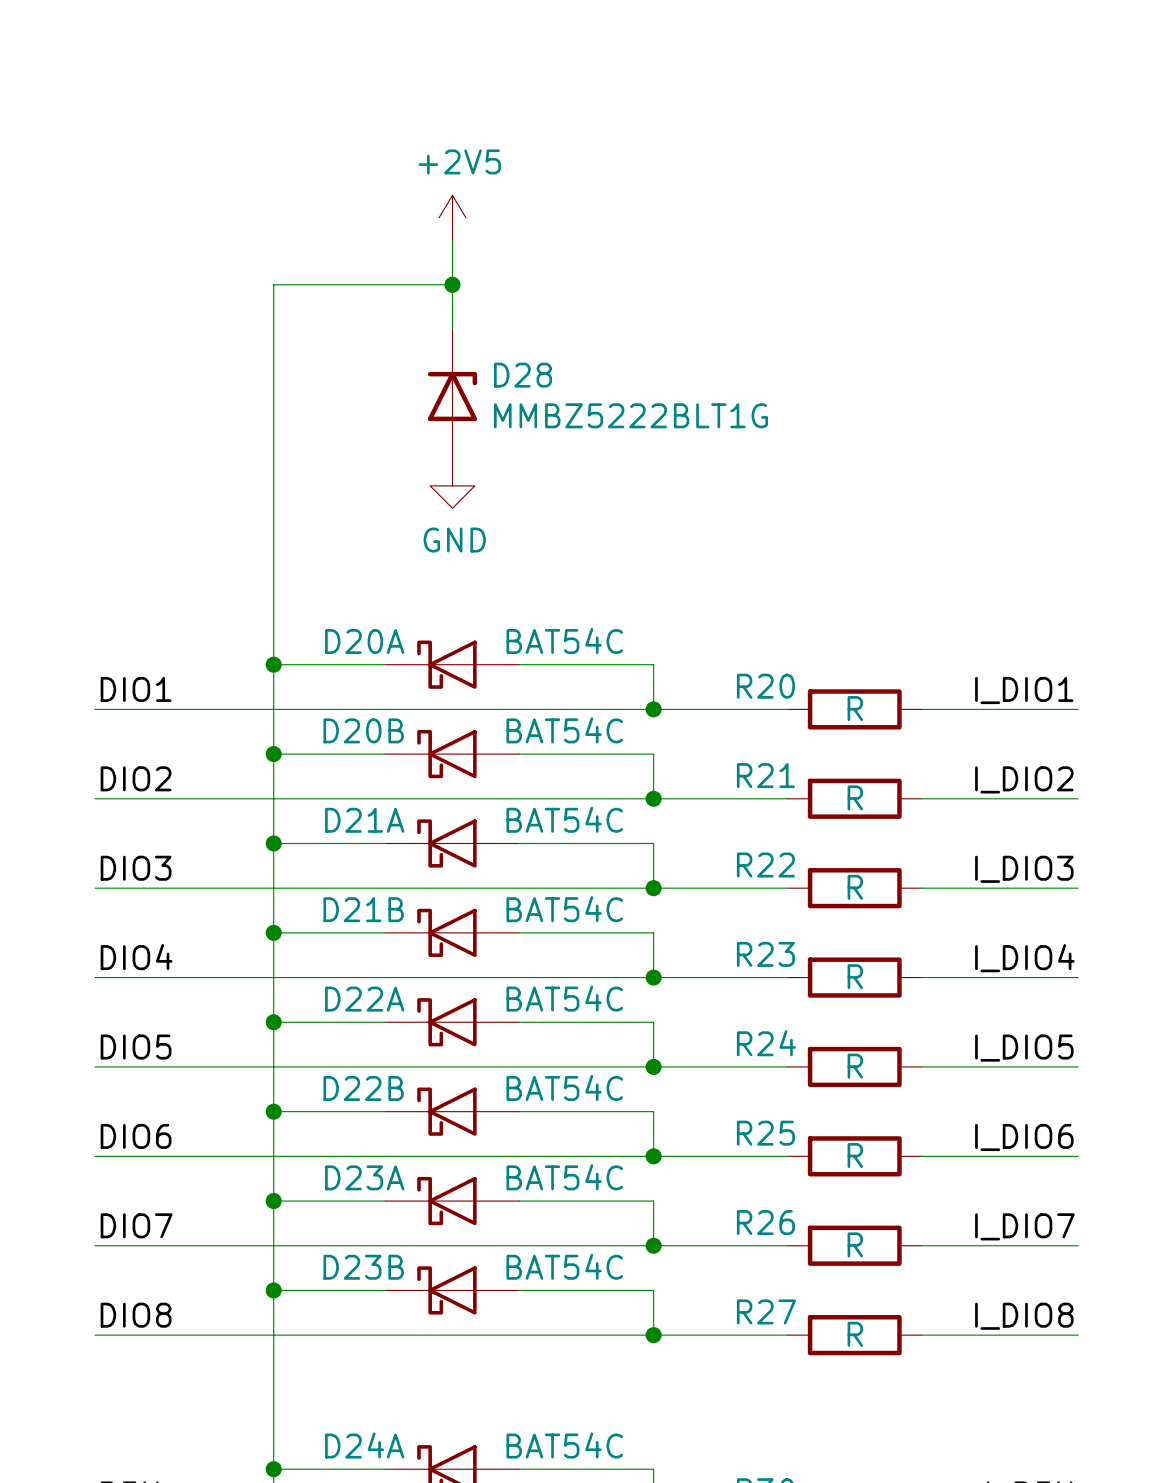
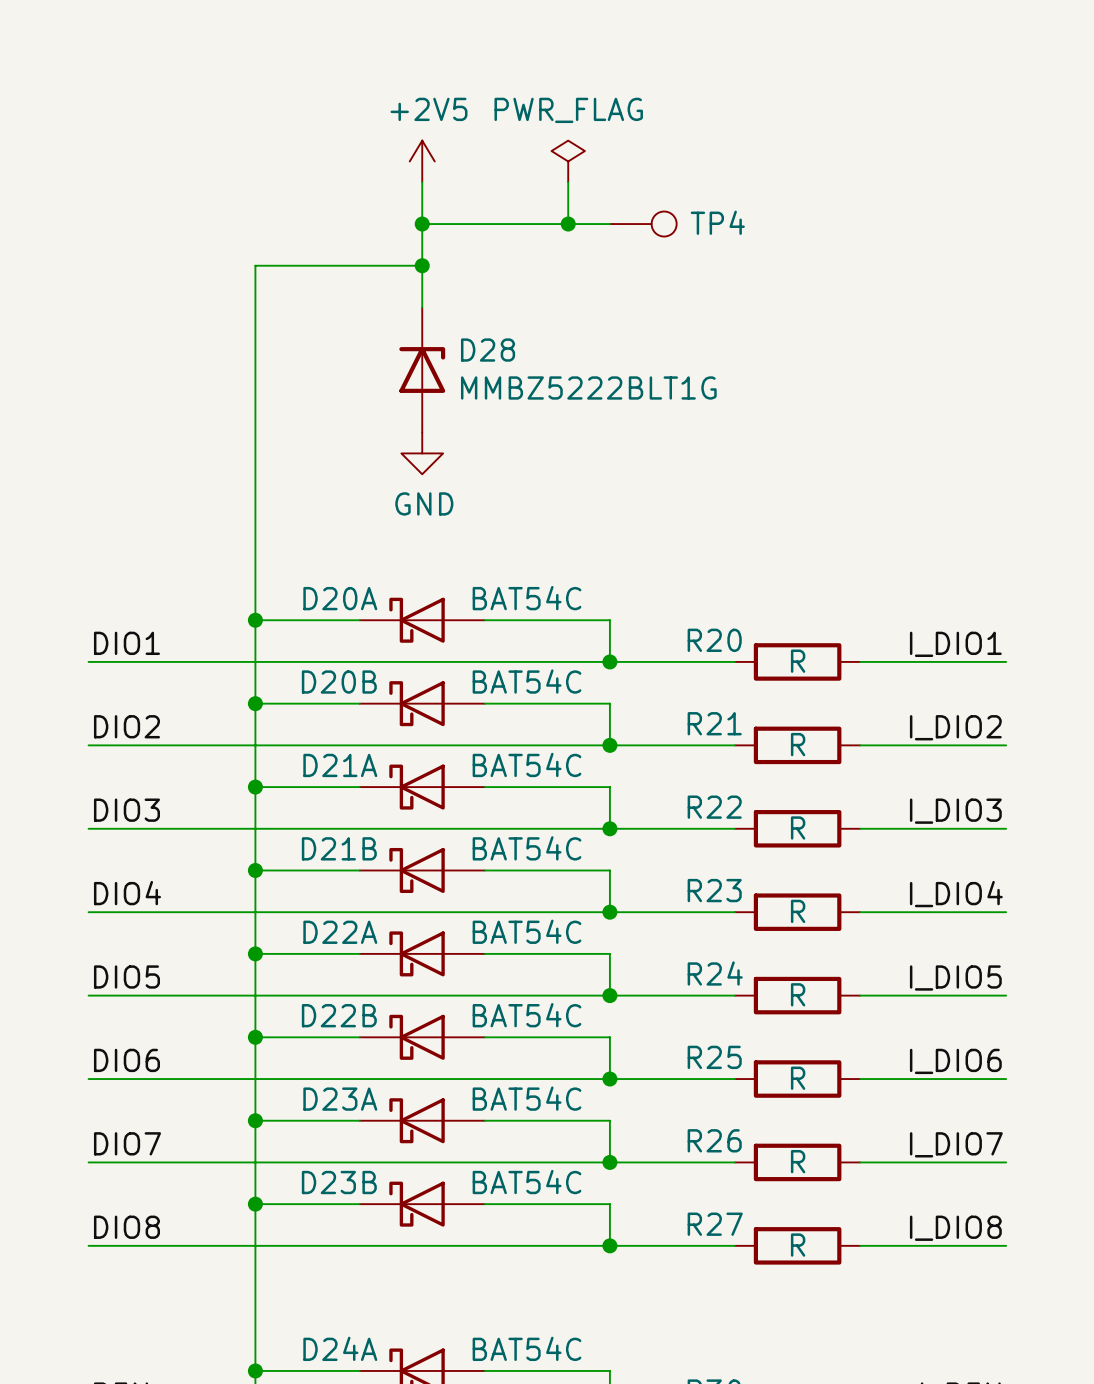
power symbol: none -> PWR_FLAG (568, 161)
wire: none -> (422, 182) (422, 224) (609, 224)
wire: none -> (568, 182) (568, 224)
power symbol position: +2V5 (452, 217) -> +2V5 (422, 161)
junction: none -> (422, 224)
junction: none -> (568, 224)
TP4: none -> (643, 224)

